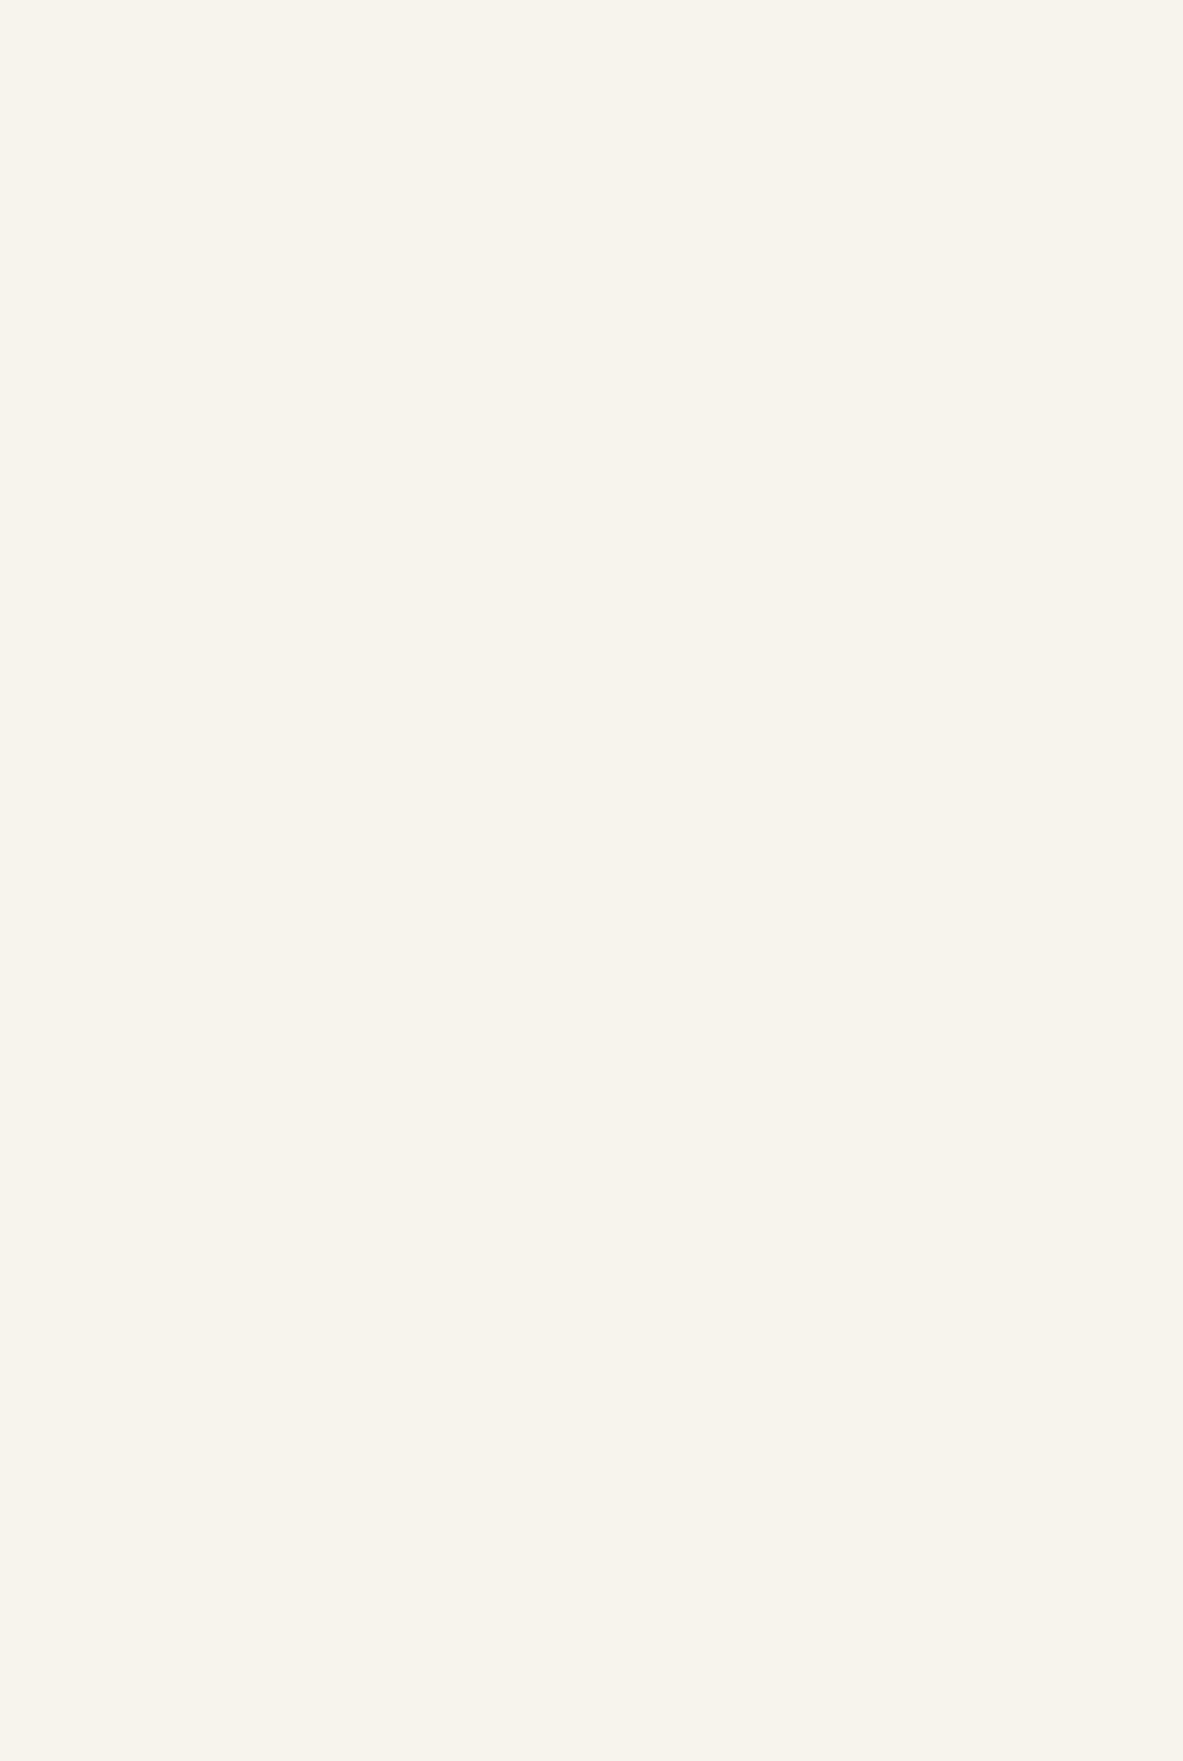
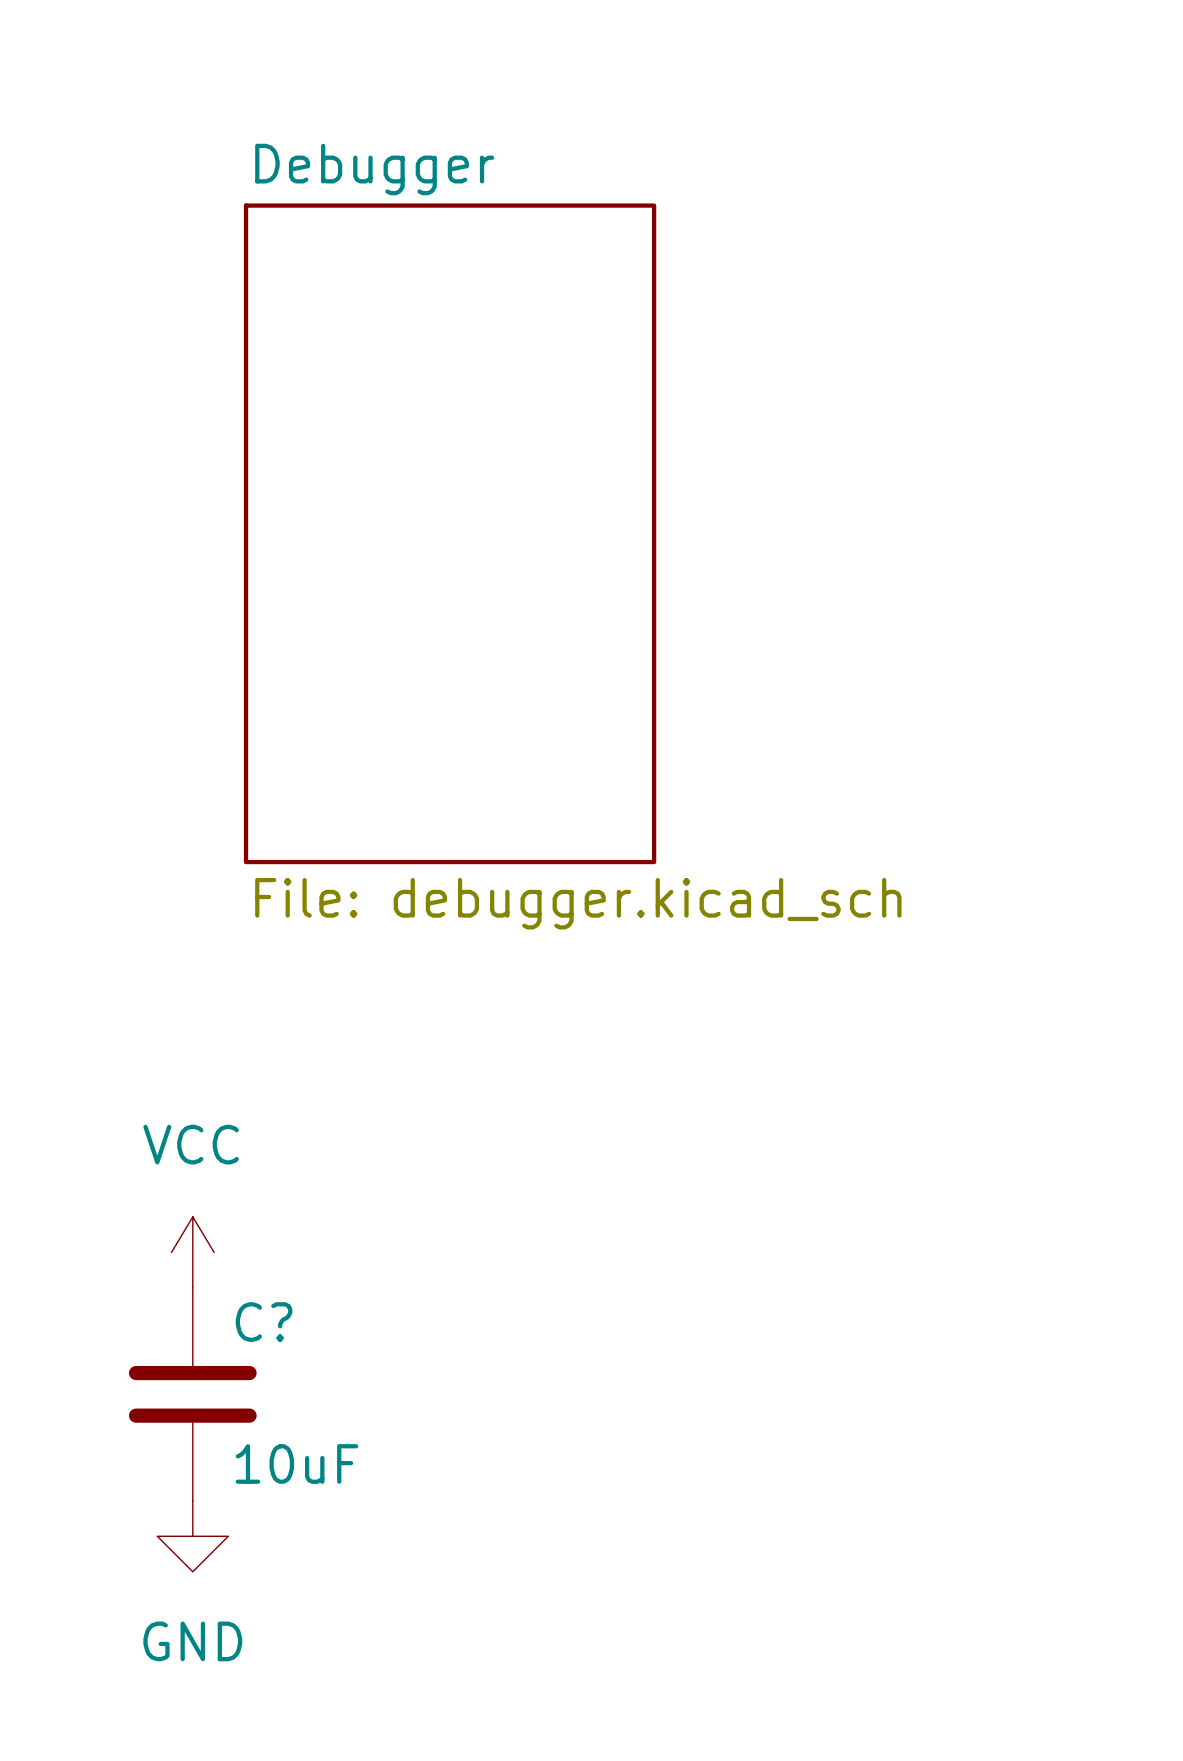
sheet Debugger: none -> File: debugger.kicad_sch (450, 533)
power symbol: none -> VCC (192, 1252)
C?: none -> 10uF (192, 1394)
power symbol: none -> GND (192, 1536)

